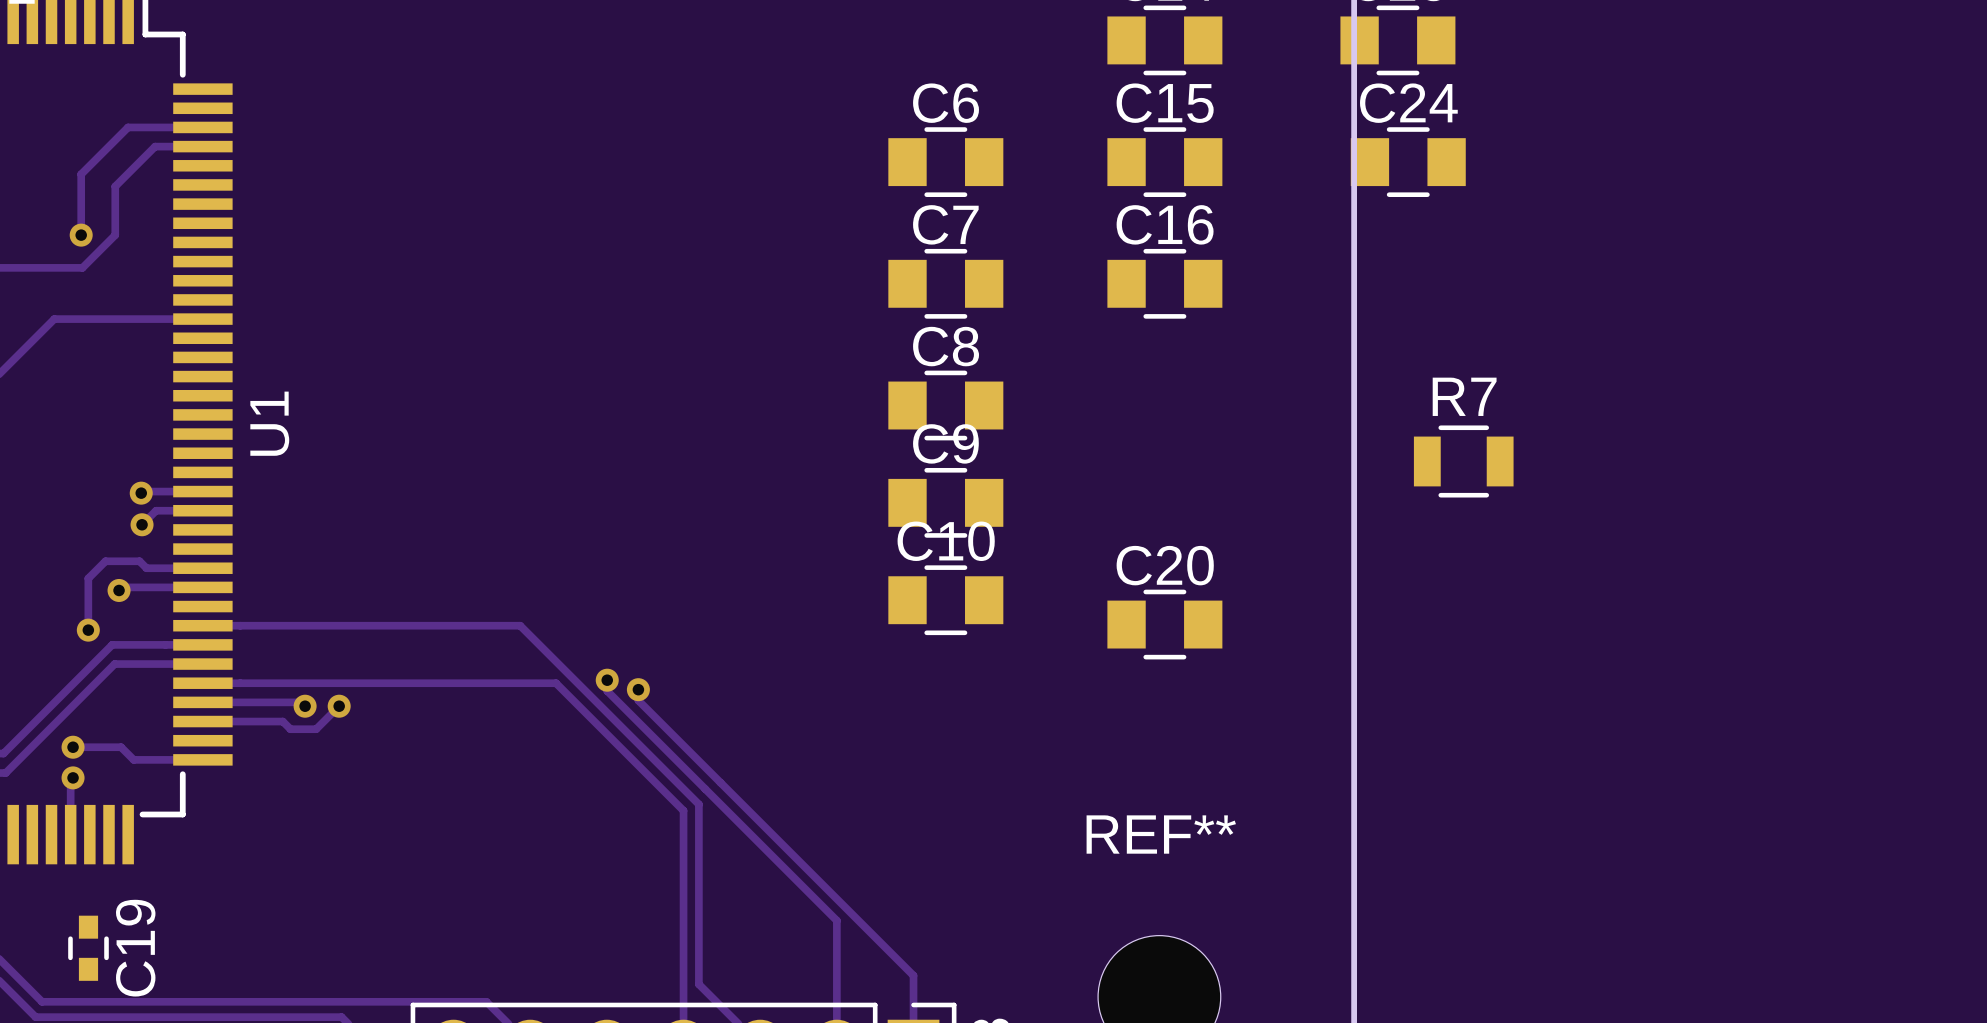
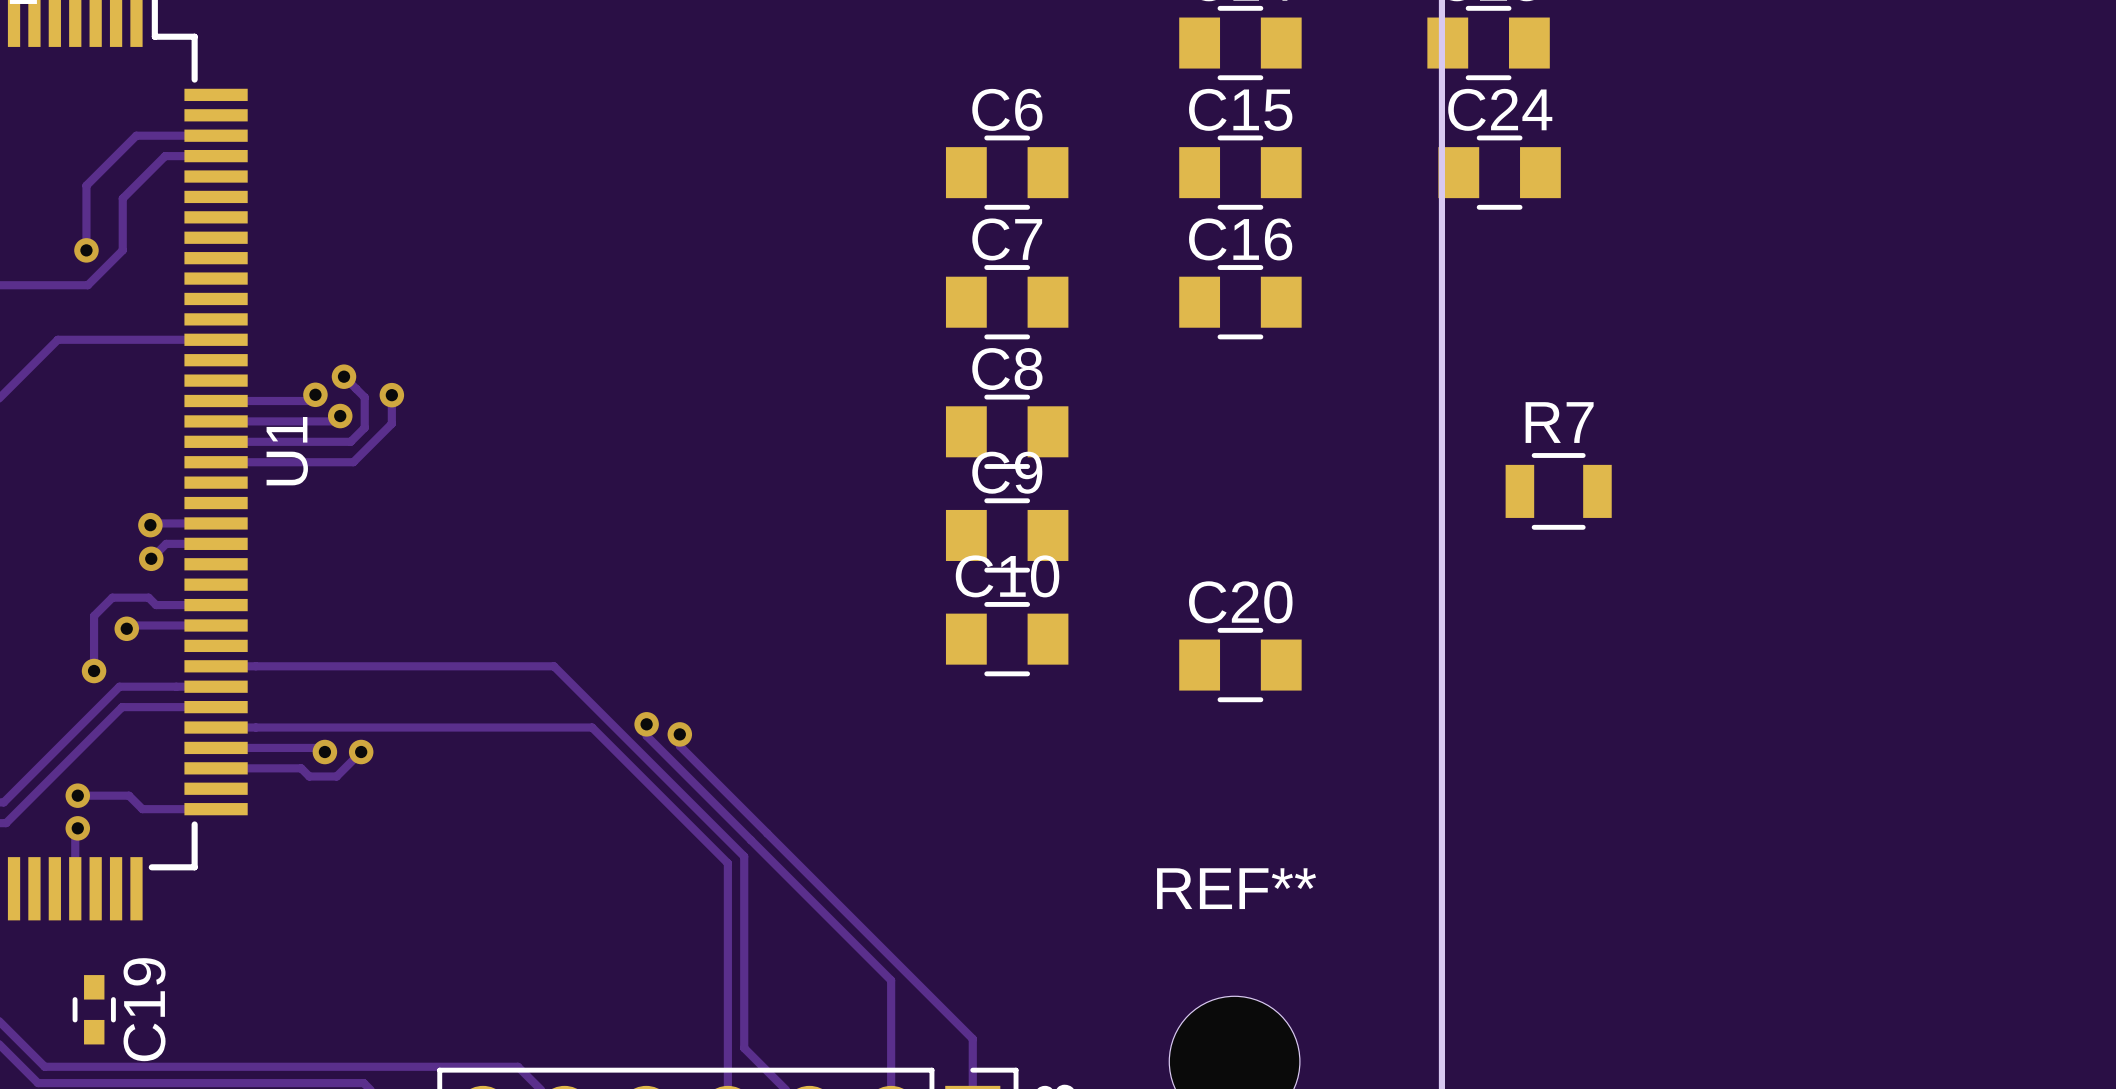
track: none -> (344, 376) (364, 397) (364, 427) (350, 441) (216, 441)
via: none -> (344, 376)
track: none -> (315, 394) (309, 401) (216, 401)
via: none -> (315, 394)
track: none -> (391, 395) (391, 423) (353, 462) (216, 462)
via: none -> (391, 395)
track: none -> (340, 416) (334, 421) (216, 421)
via: none -> (340, 416)

